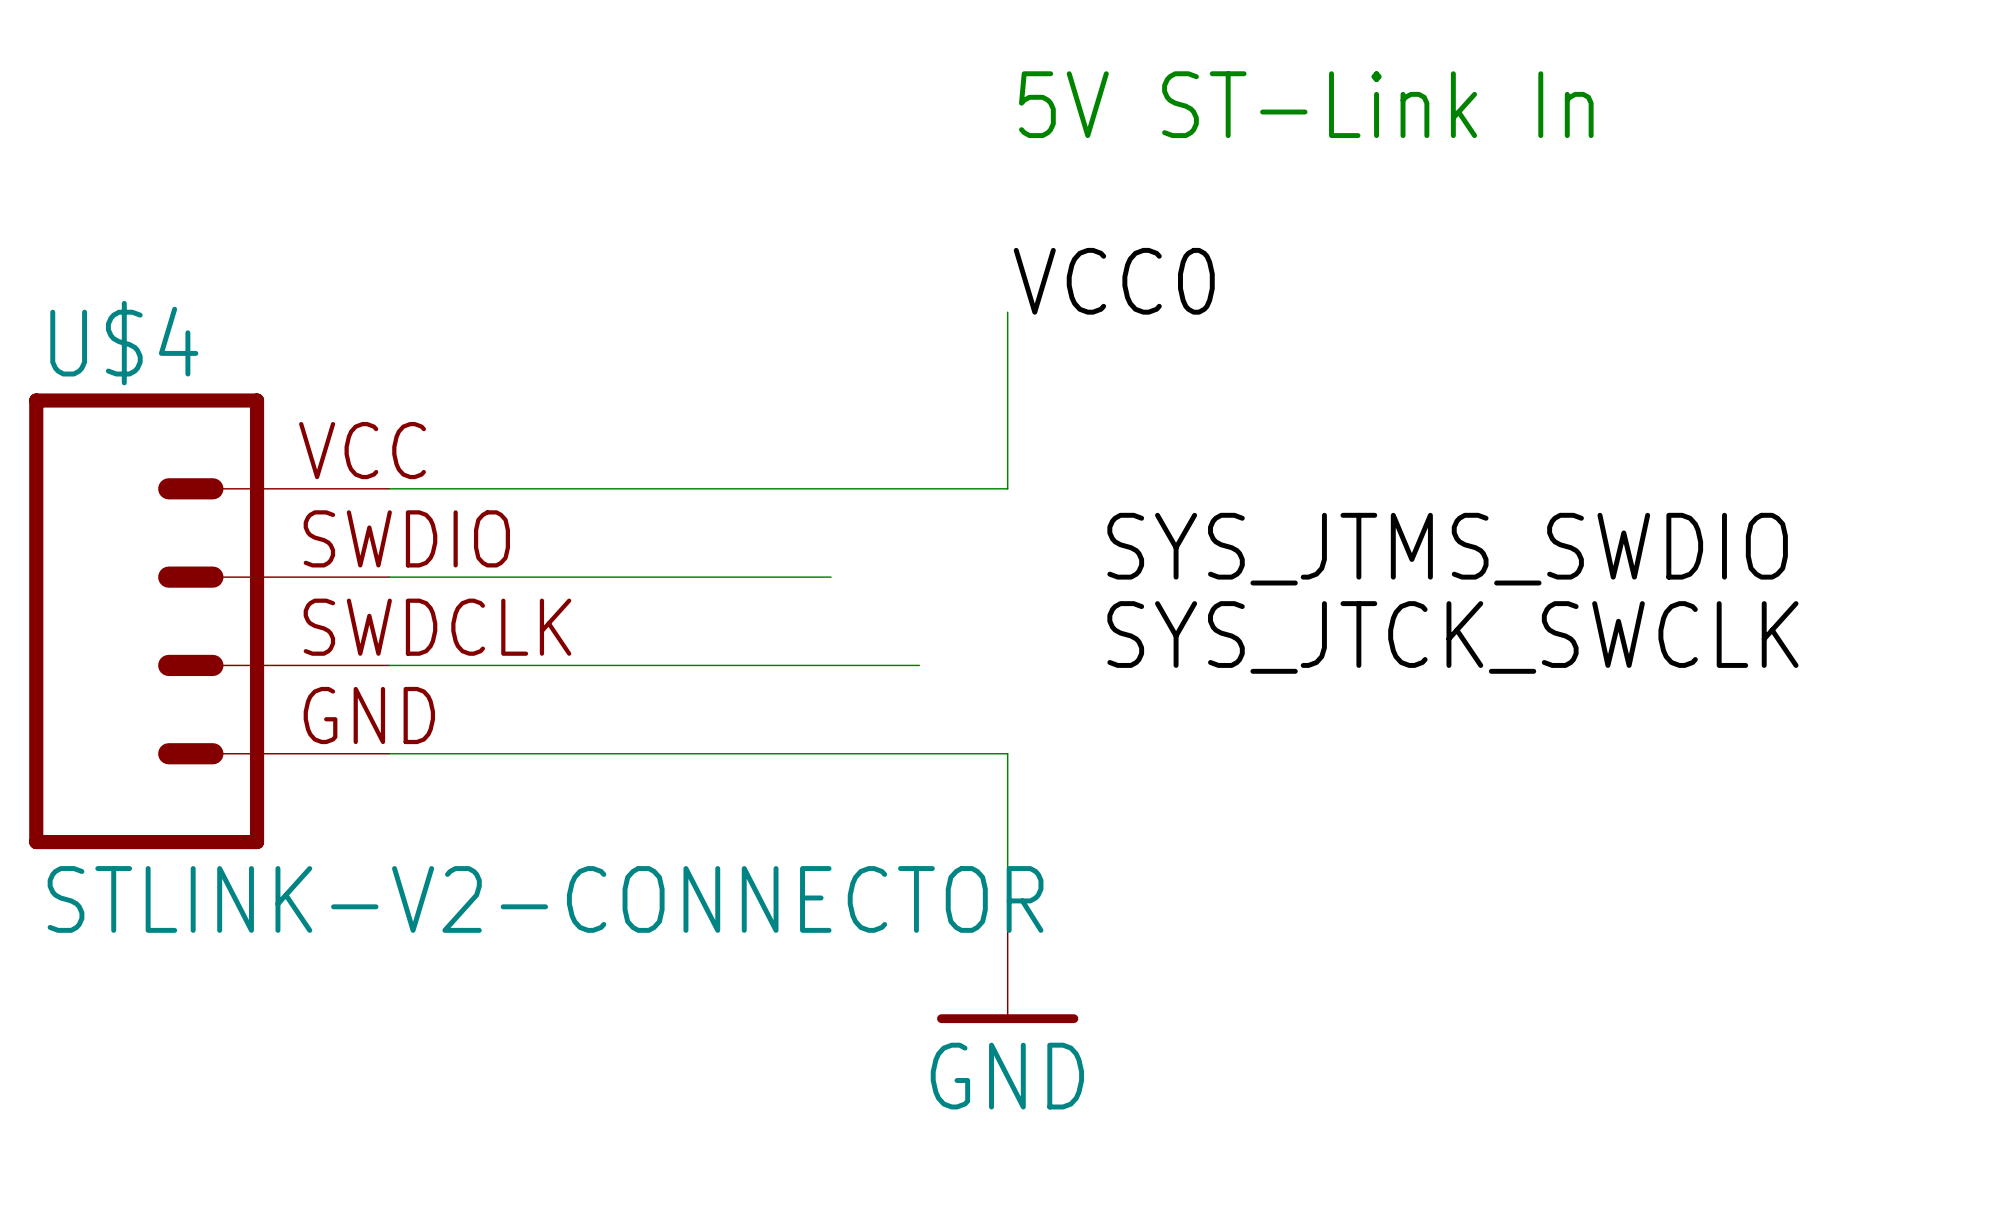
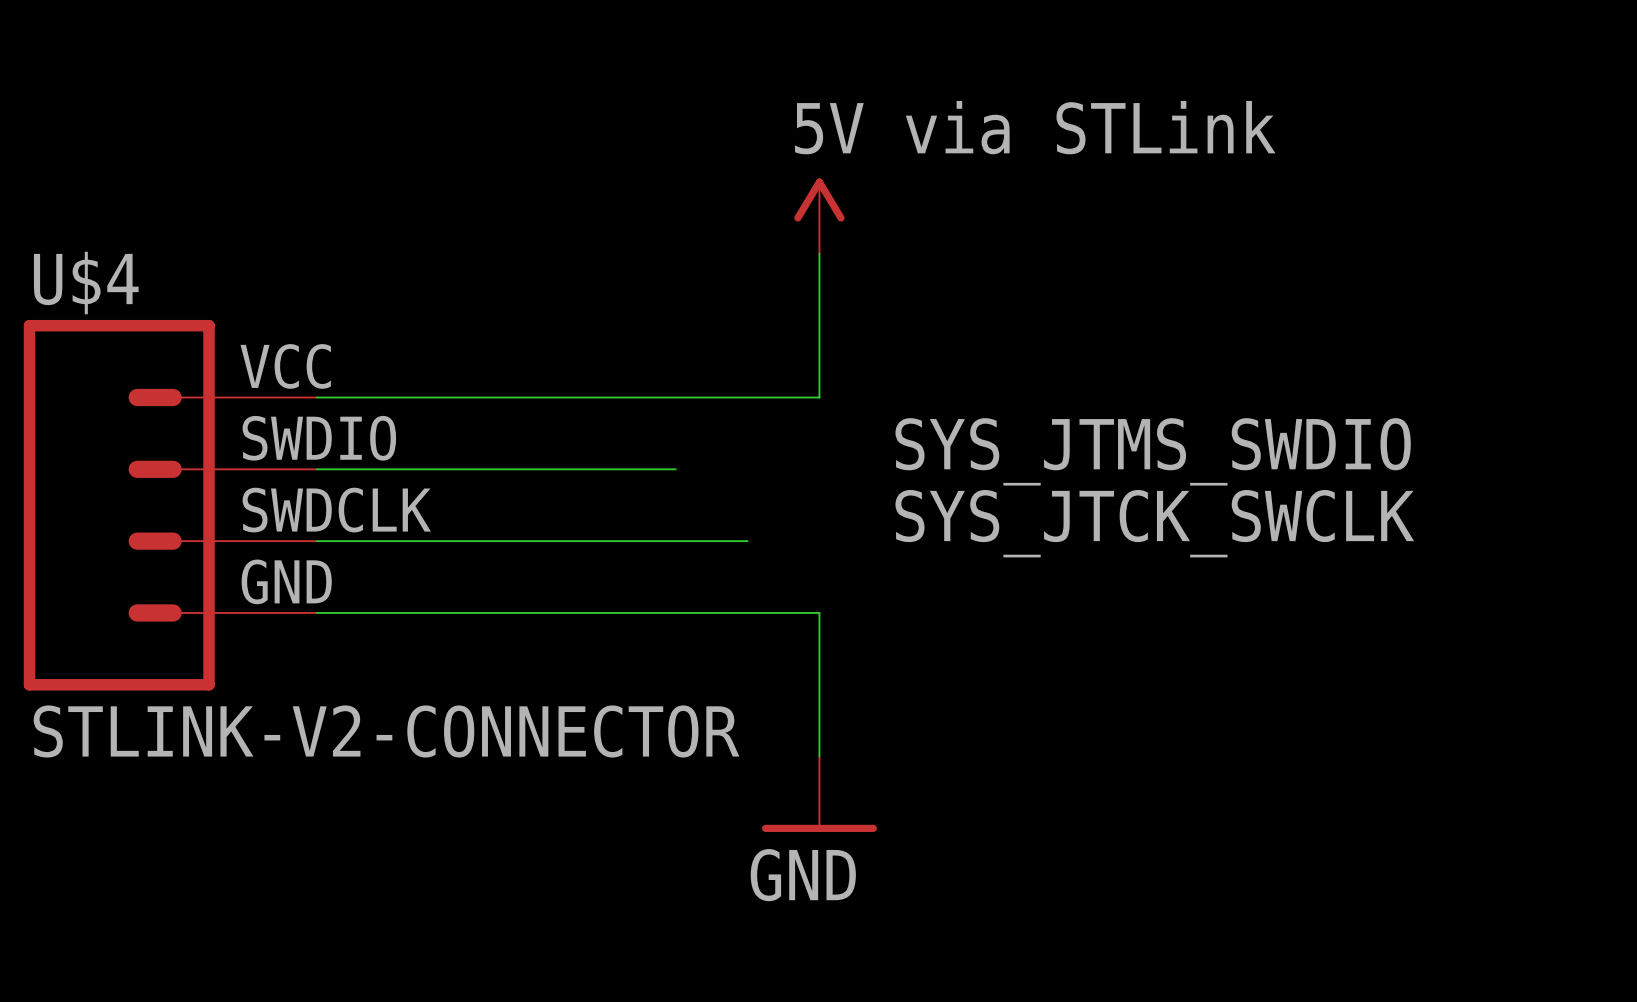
text: 5V ST-Link In (1306, 104) -> none
power symbol: none -> 5V via STLink (819, 216)
label: VCC0 (1114, 281) -> none

